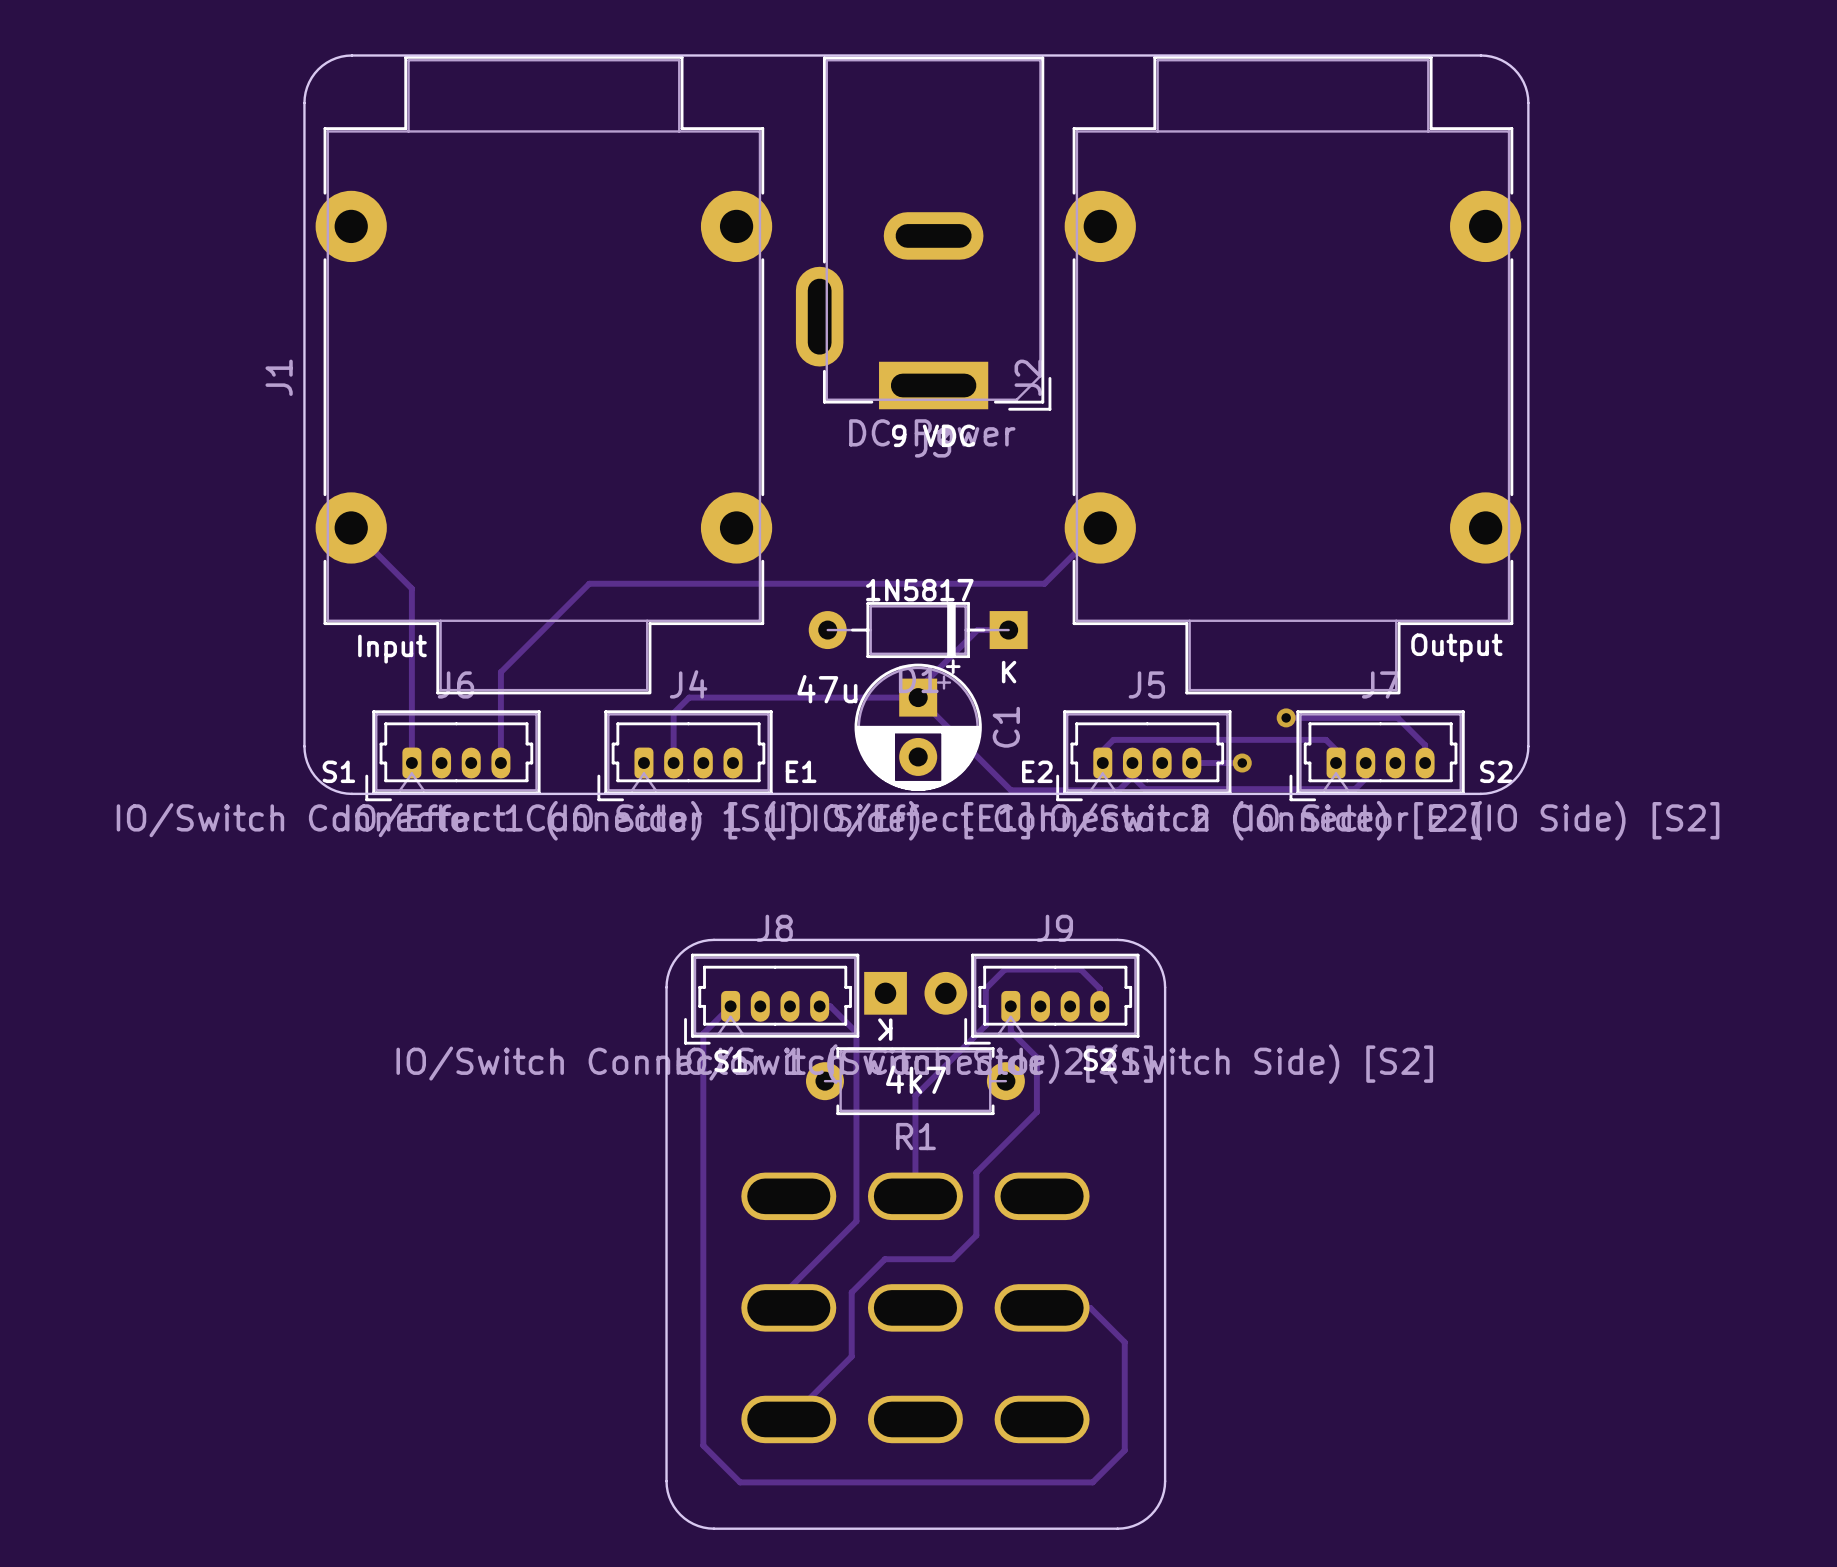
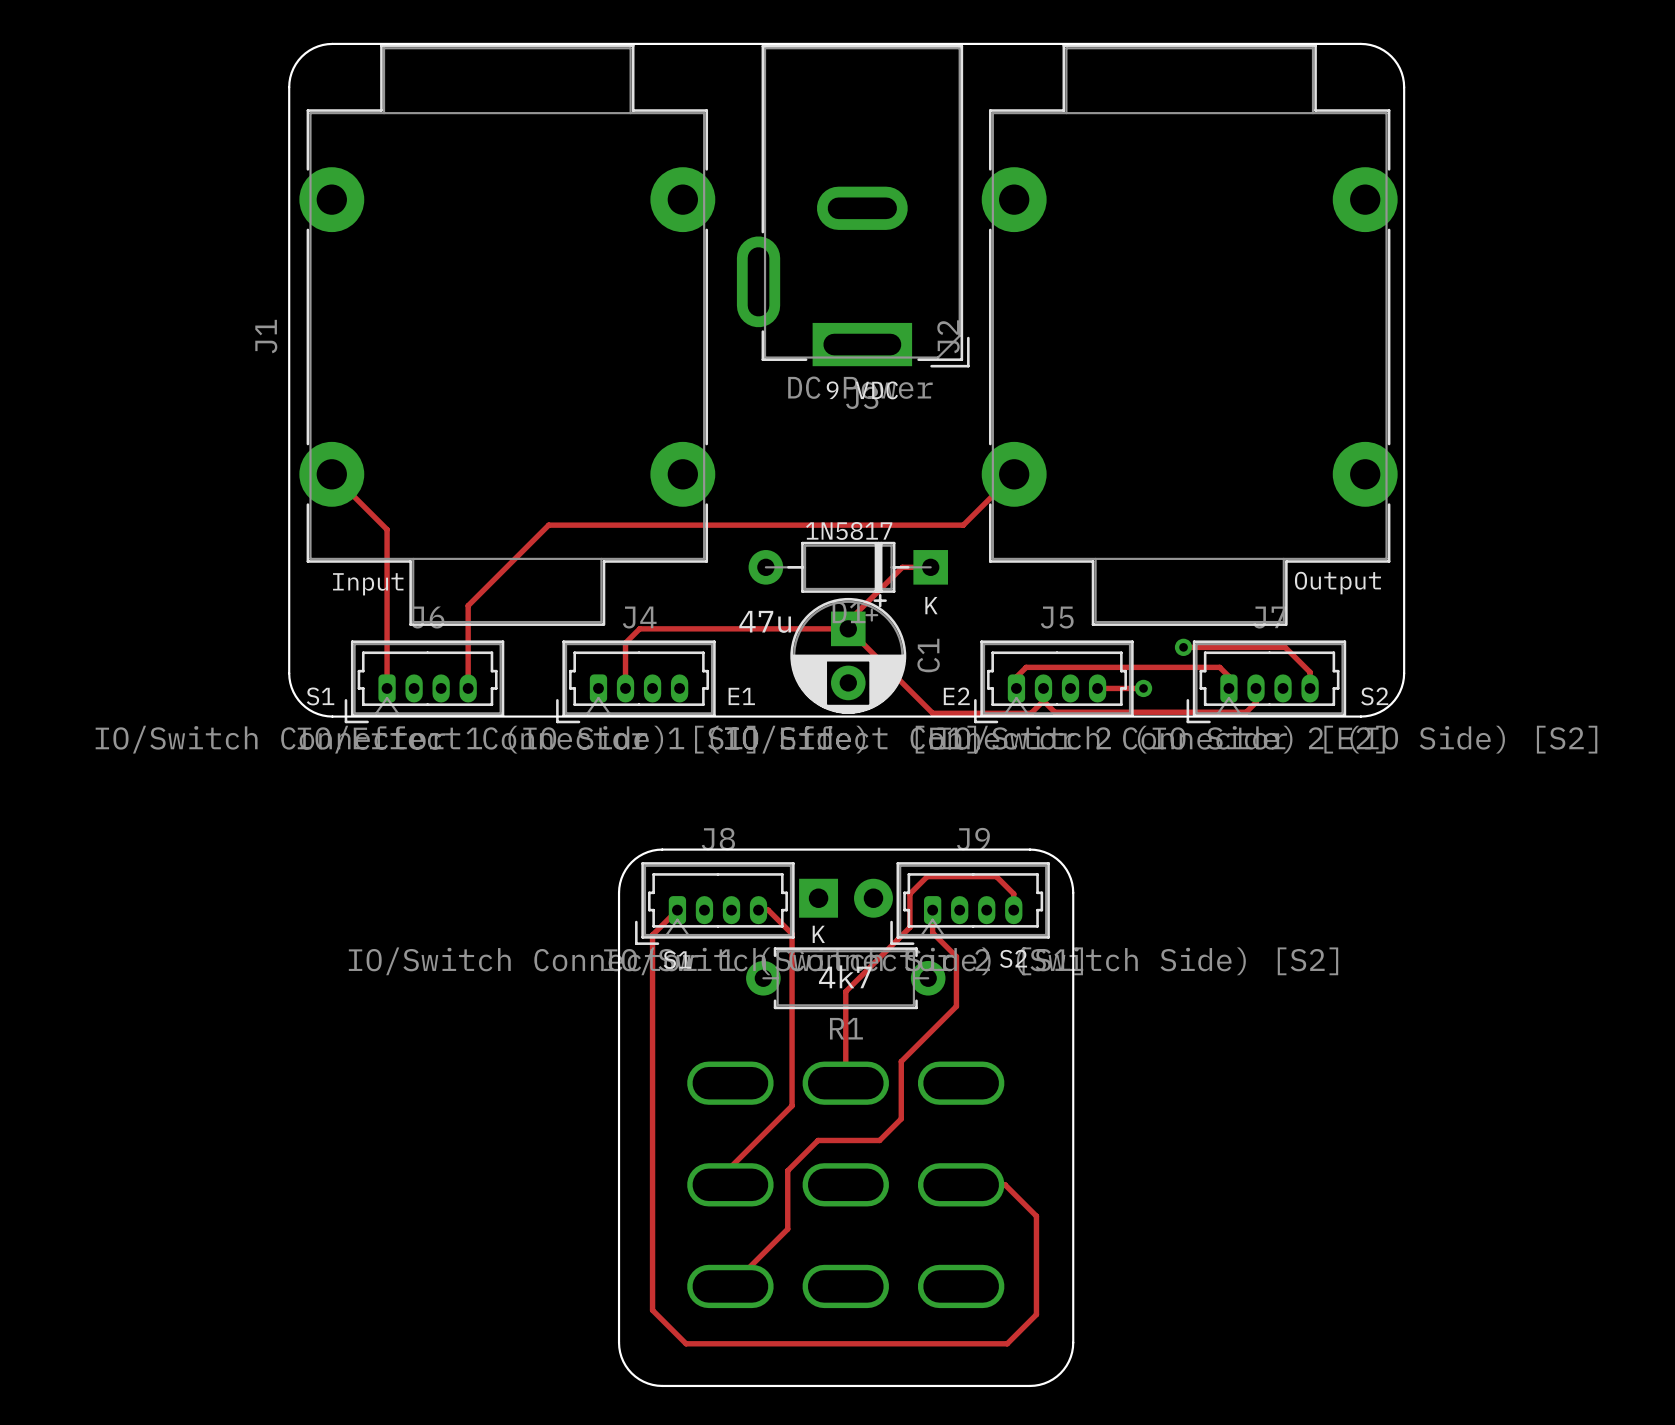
part text rotation: 0° (885, 1029) -> 180° (818, 934)

